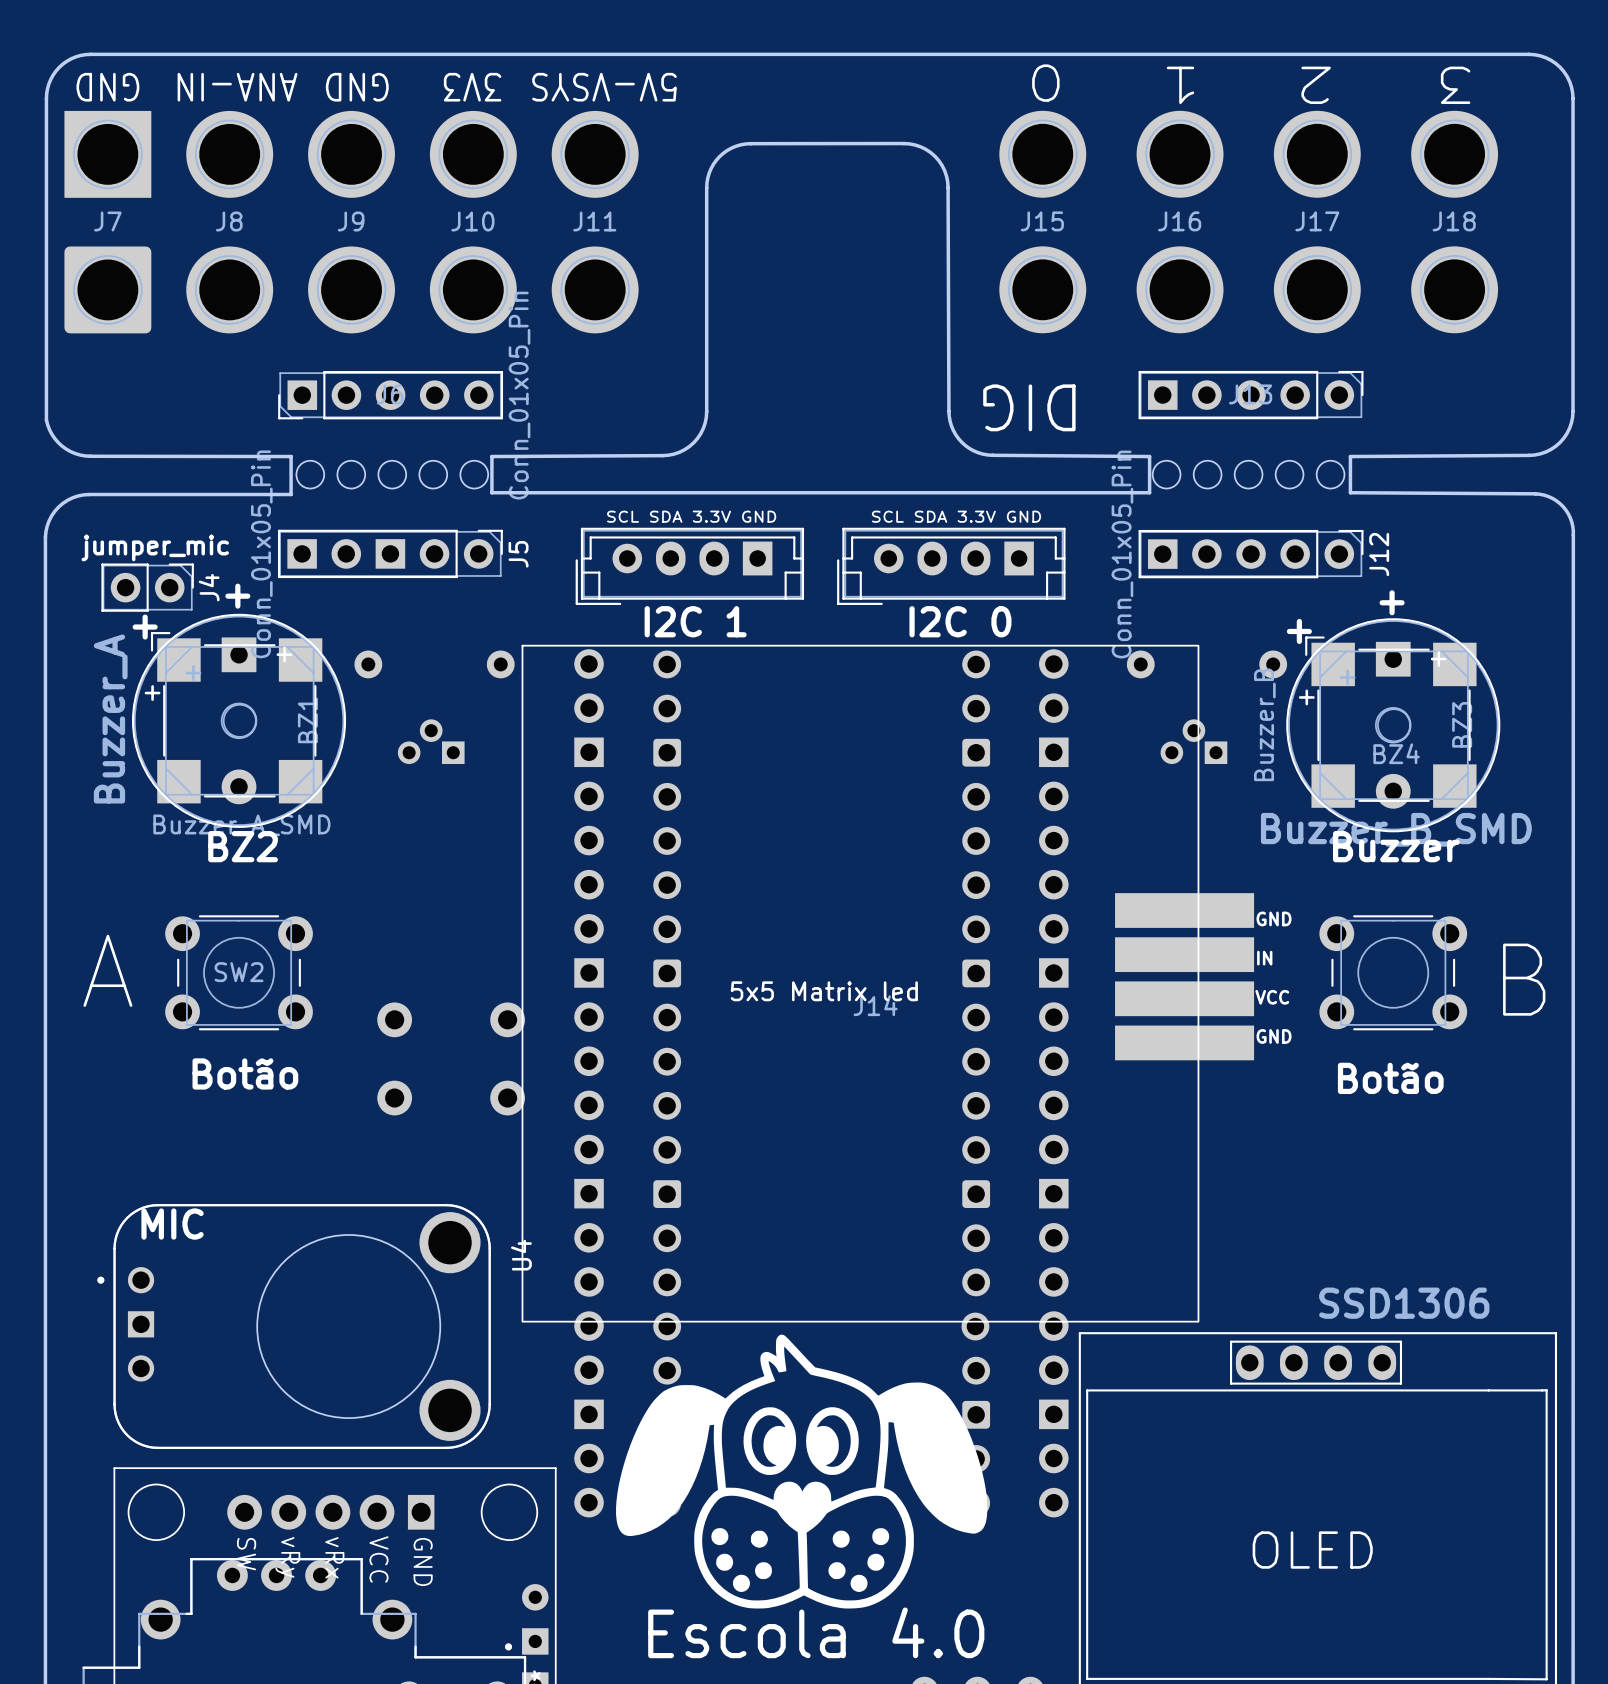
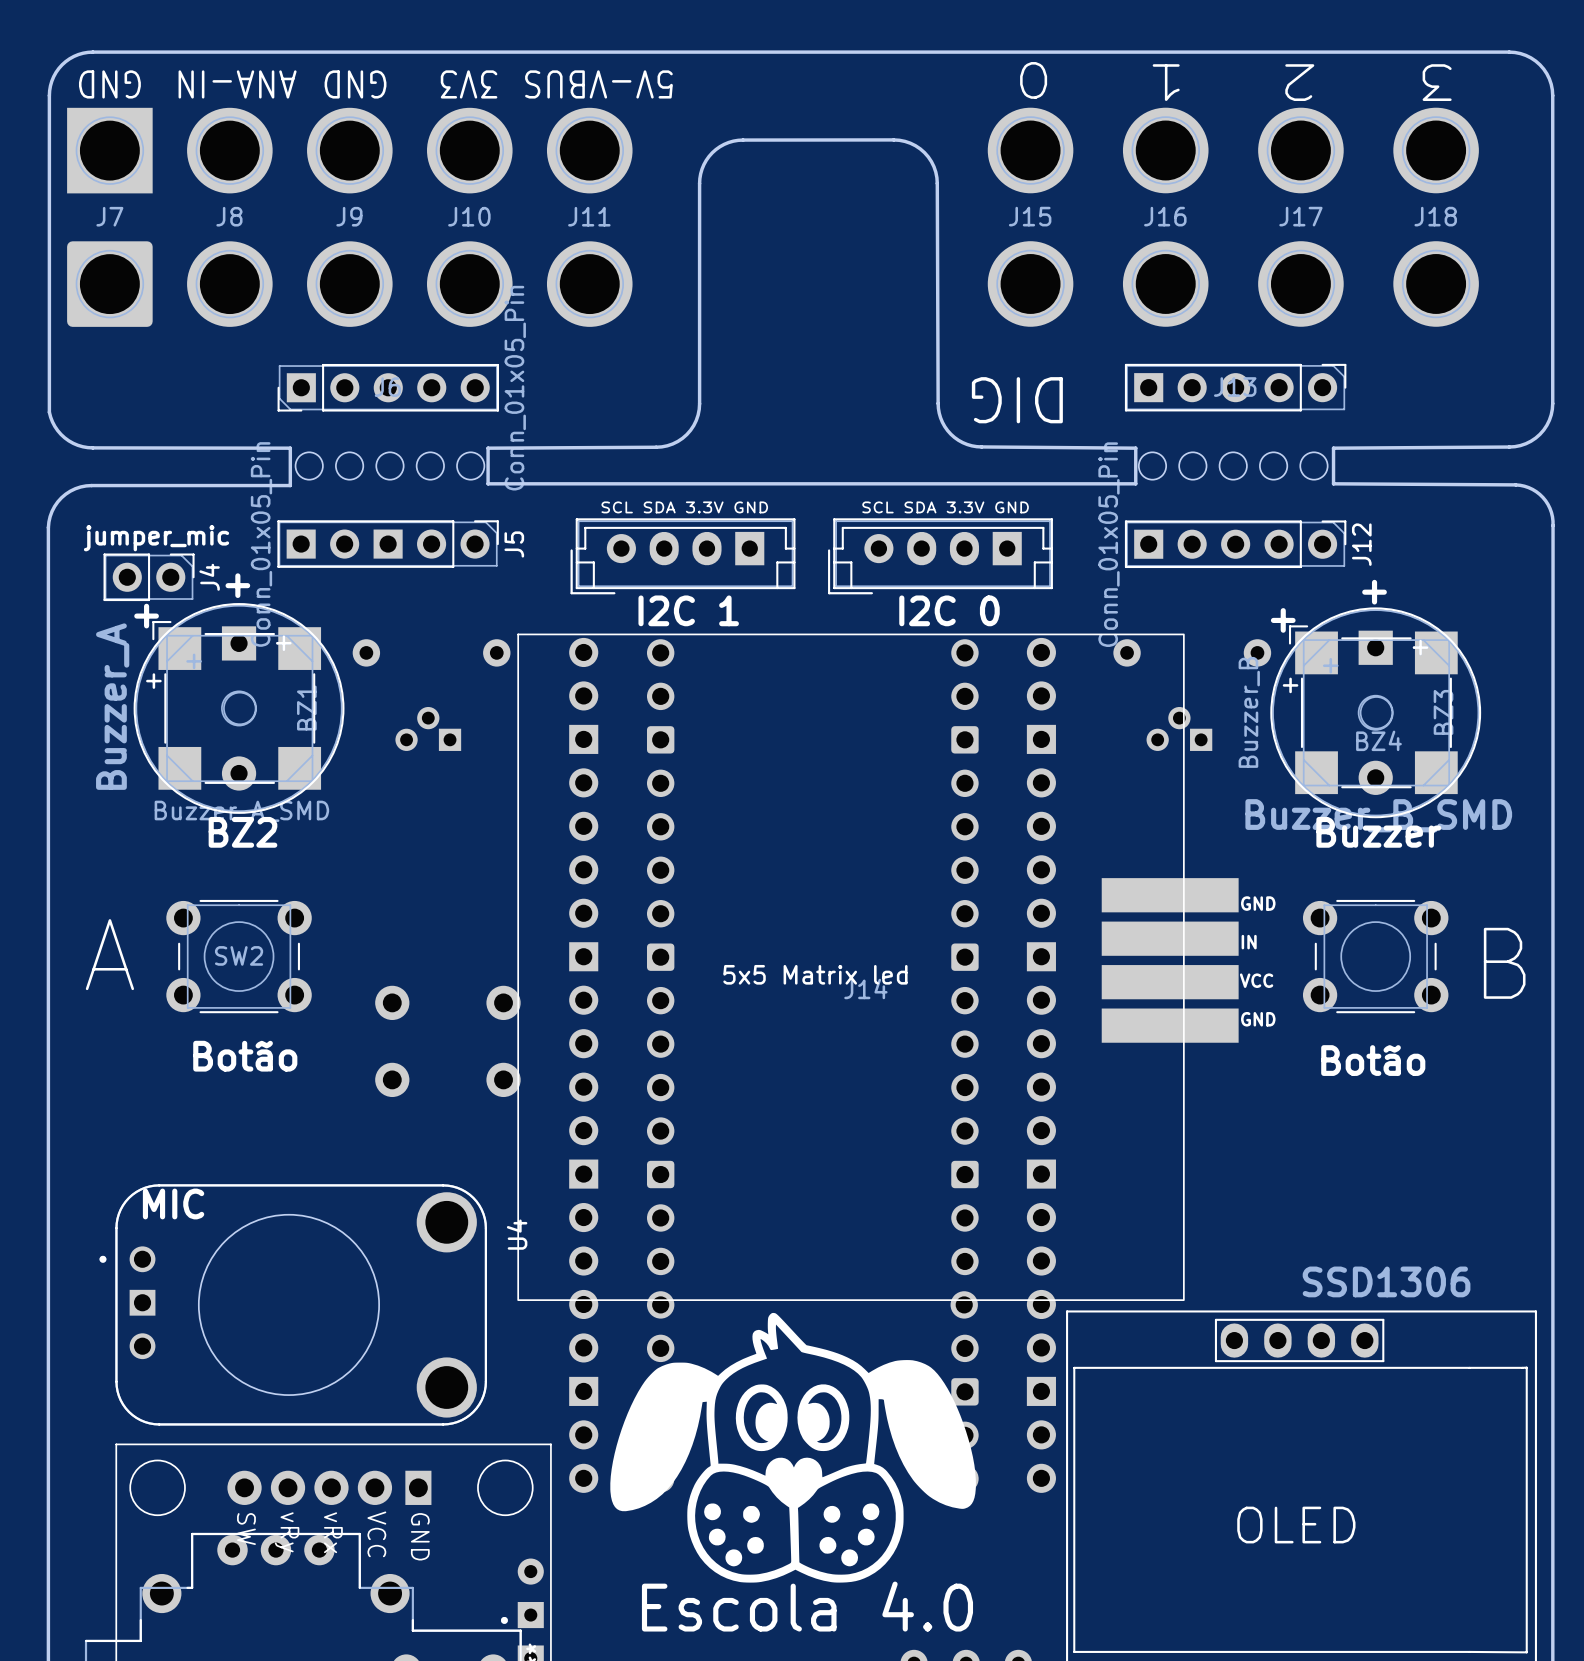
J11 value: 5V-VSYS (604, 87) -> 5V-VBUS (598, 84)
round board edge position: (348, 1326) -> (288, 1304)

